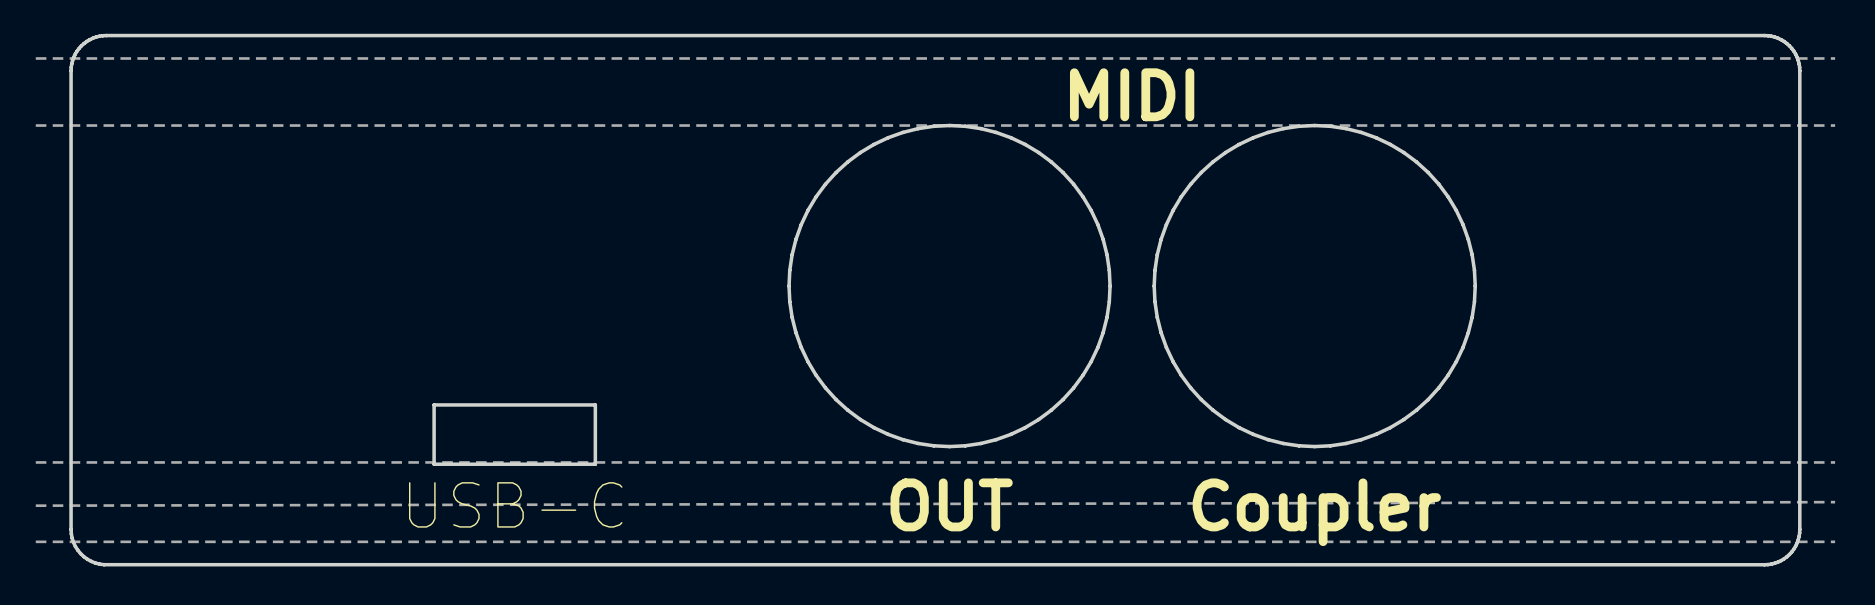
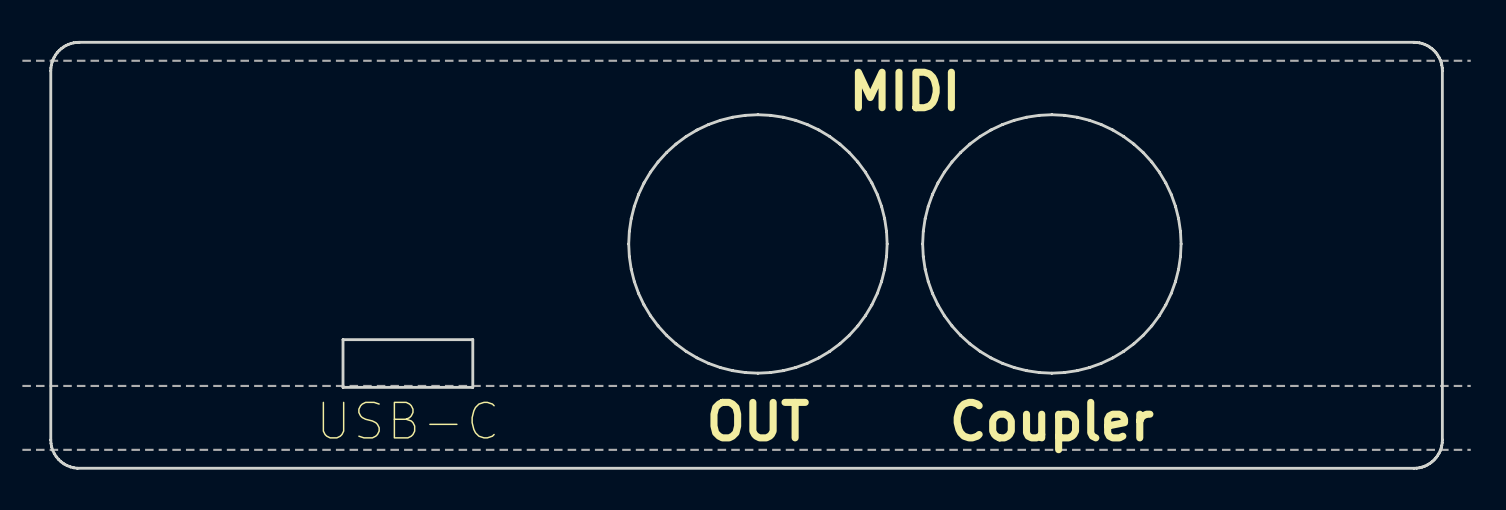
line: (35, 125) (1835, 125) -> none
line: (1835, 502) (35, 505) -> none

